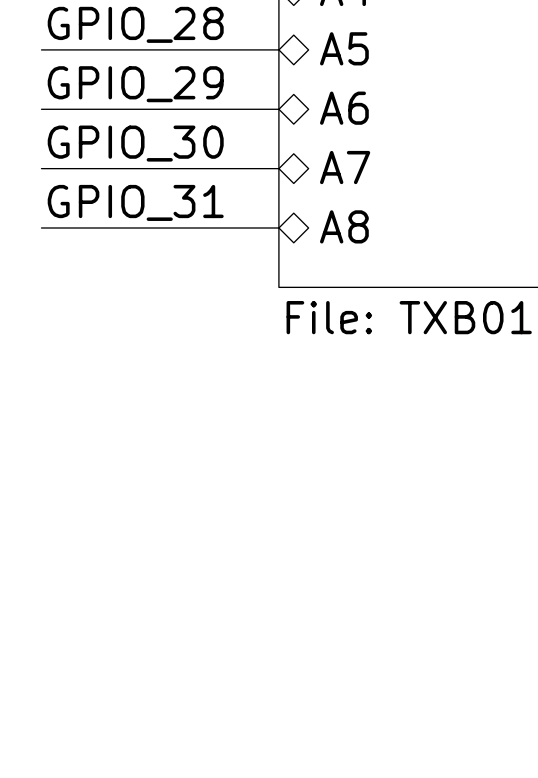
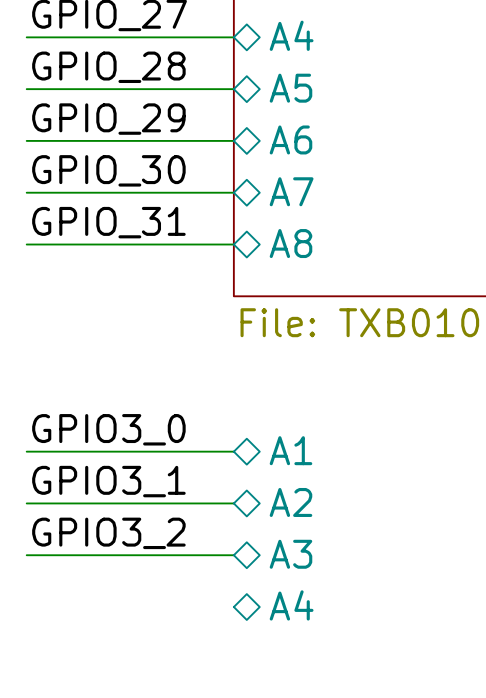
label: none -> GPIO3_0 (108, 429)
sheet pin: none -> A1 (290, 450)
wire: none -> (26, 451) (233, 451)
label: none -> GPIO3_1 (108, 481)
sheet pin: none -> A2 (290, 502)
wire: none -> (26, 503) (233, 503)
label: none -> GPIO3_2 (108, 533)
sheet pin: none -> A3 (290, 554)
wire: none -> (26, 555) (233, 555)
sheet pin: none -> A4 (291, 605)

